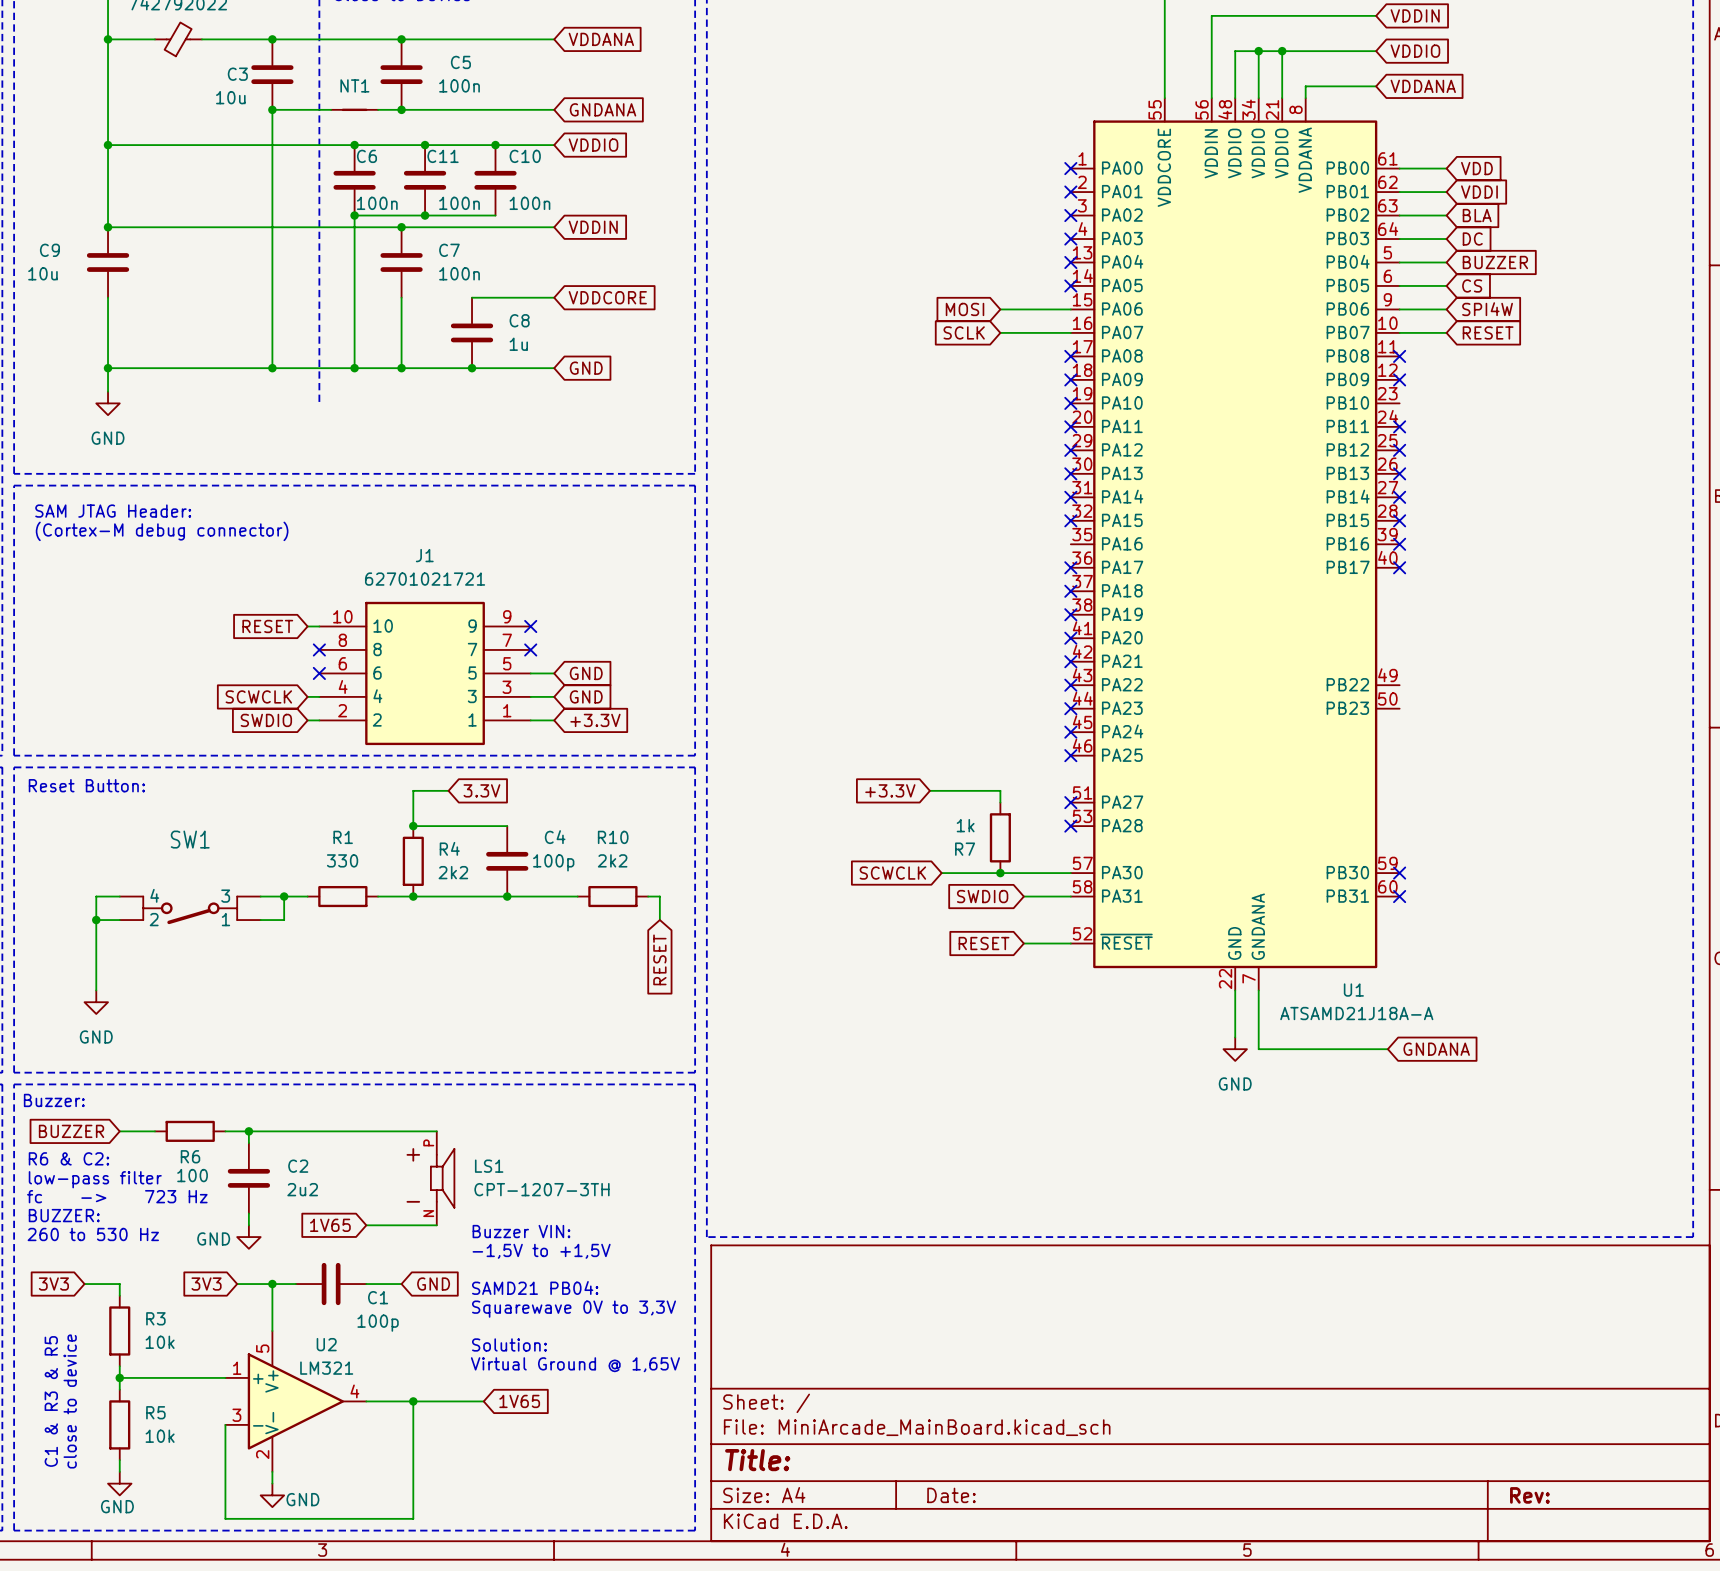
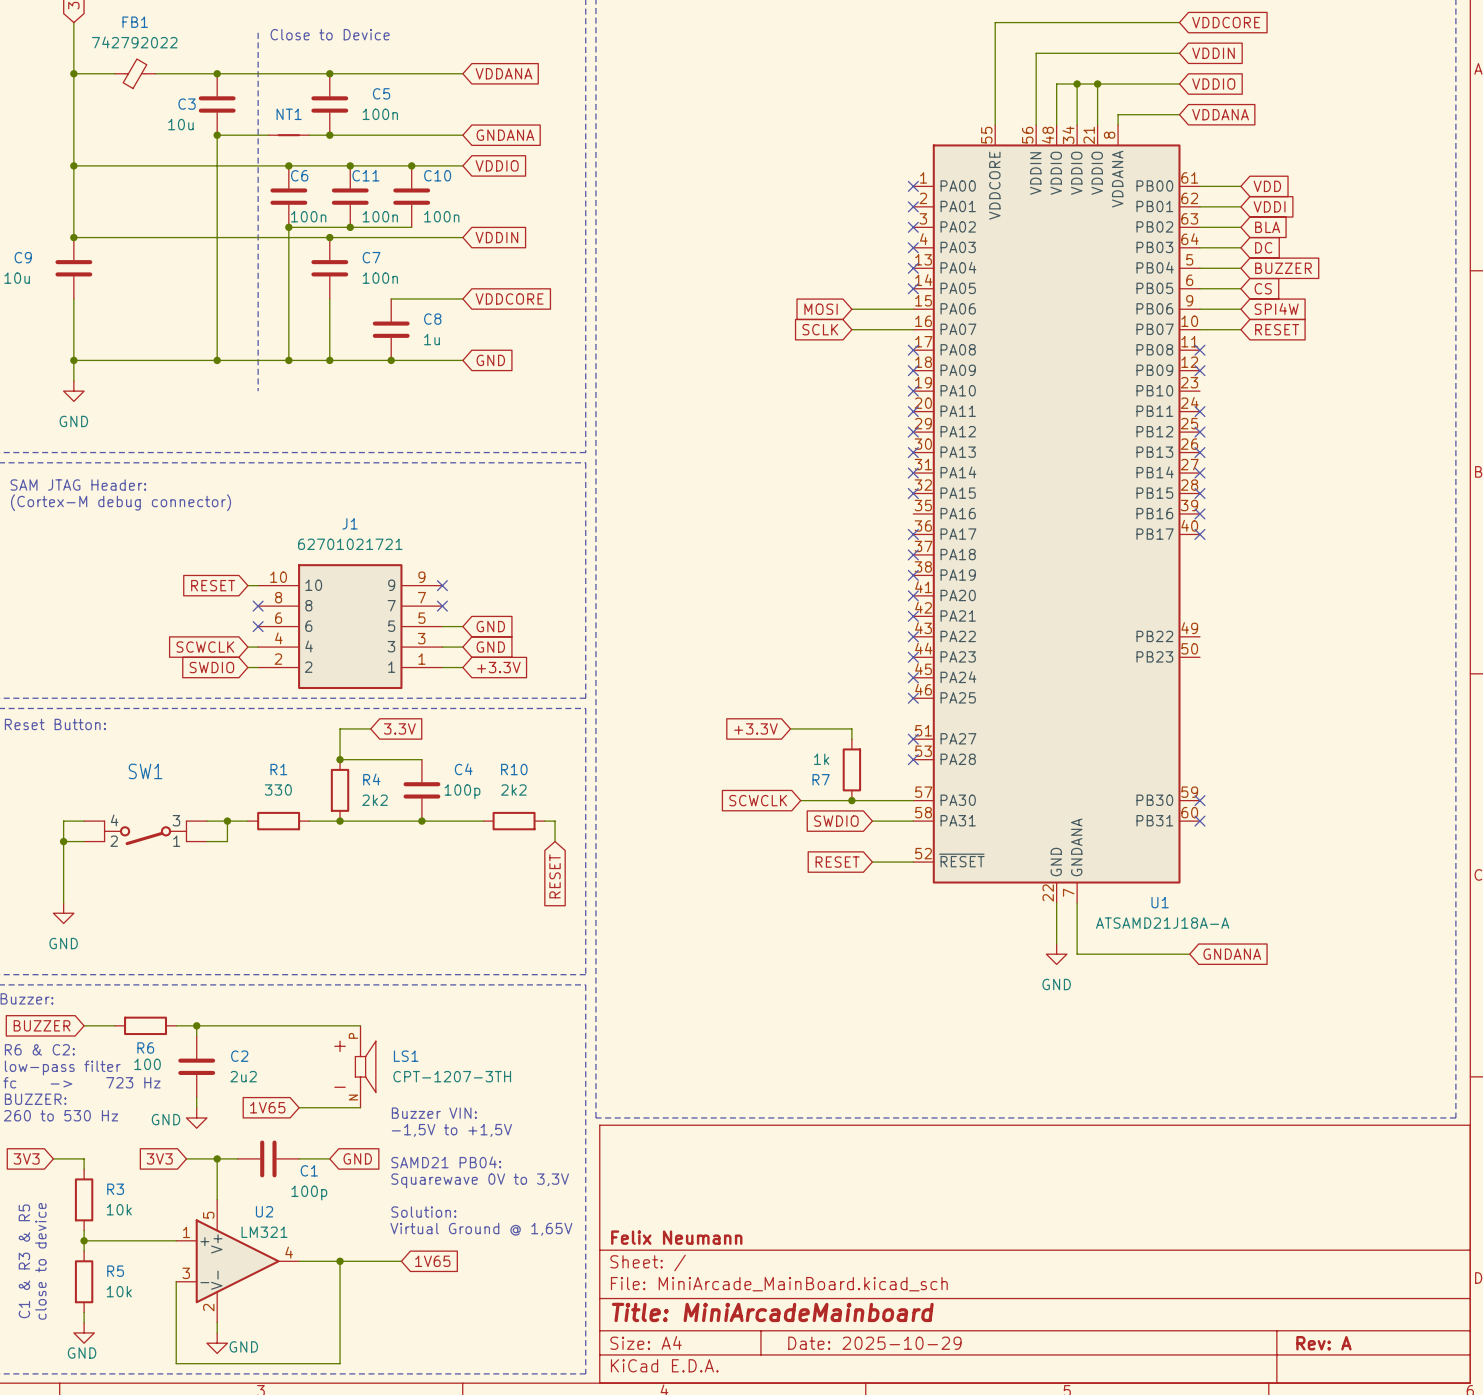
title block: none -> Felix Neumann (676, 1237)
title block: Title: (757, 1460) -> Title: MiniArcadeMainboard (772, 1312)
title block: Date: (951, 1495) -> Date: 2025-10-29 (874, 1343)
title block: Rev: (1529, 1495) -> Rev: A (1323, 1343)

